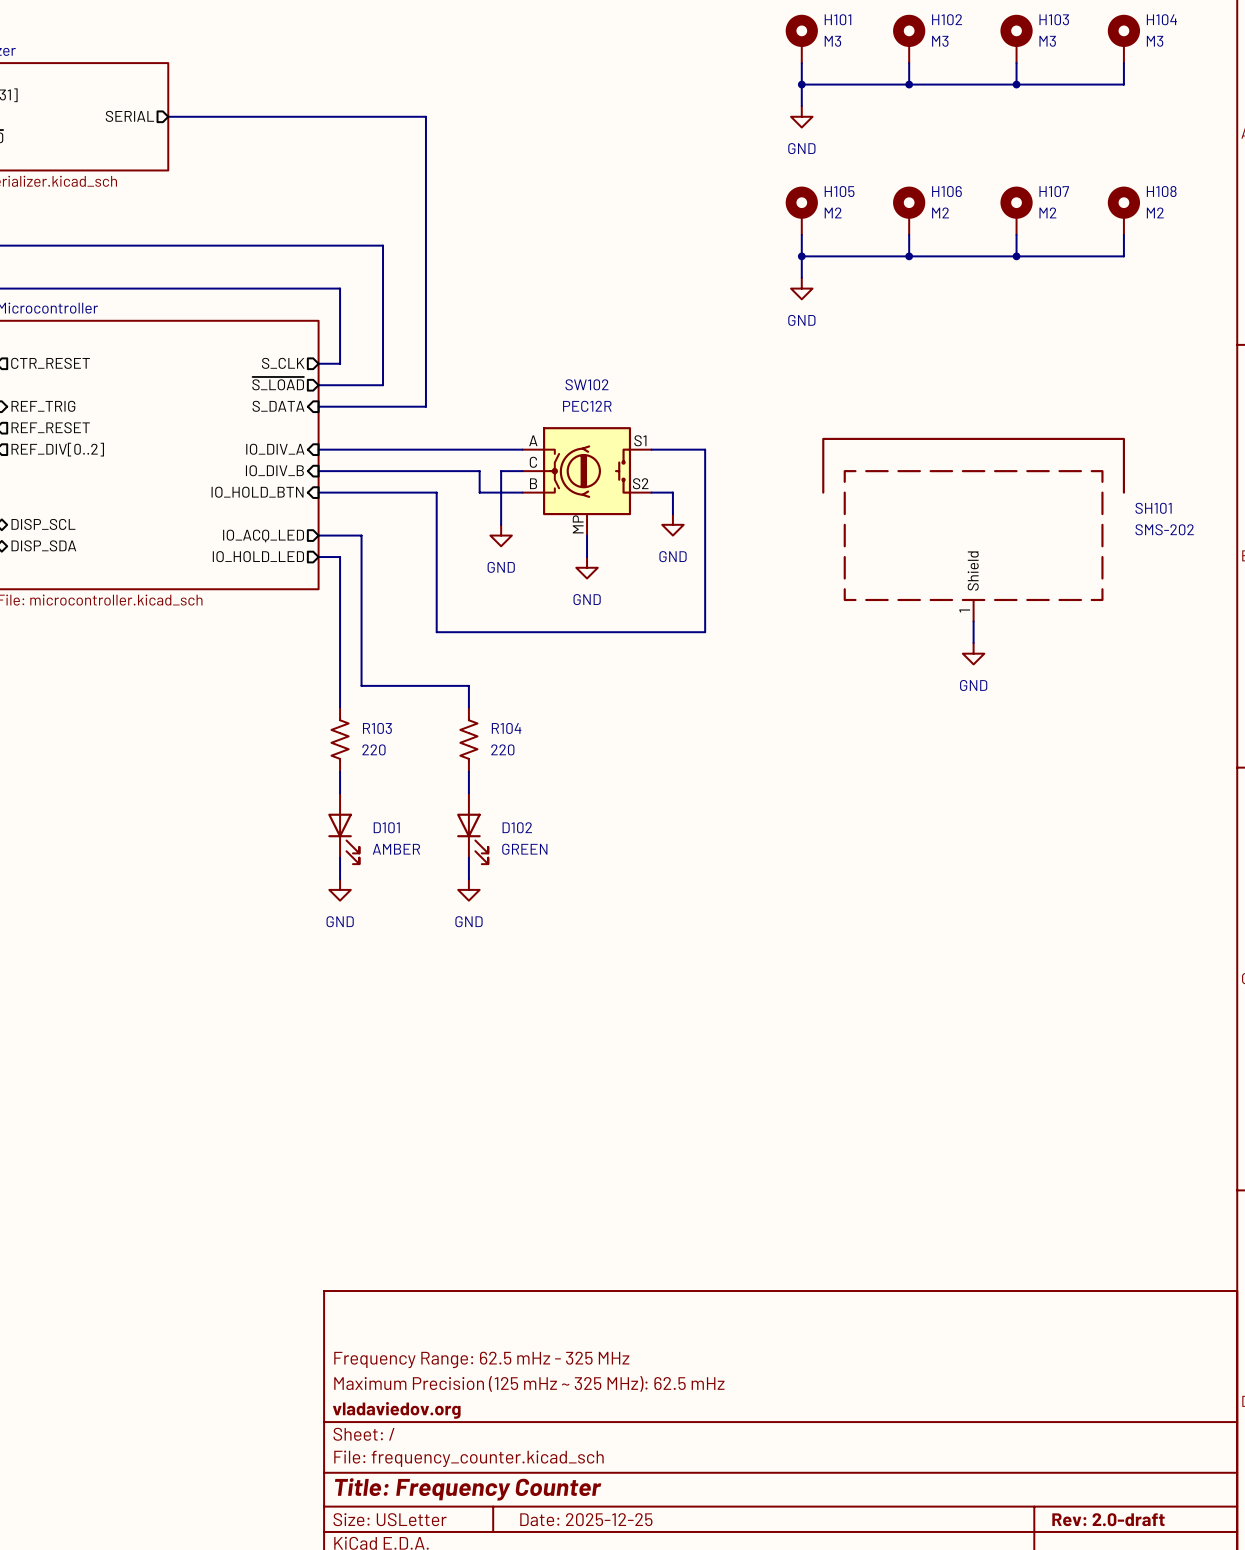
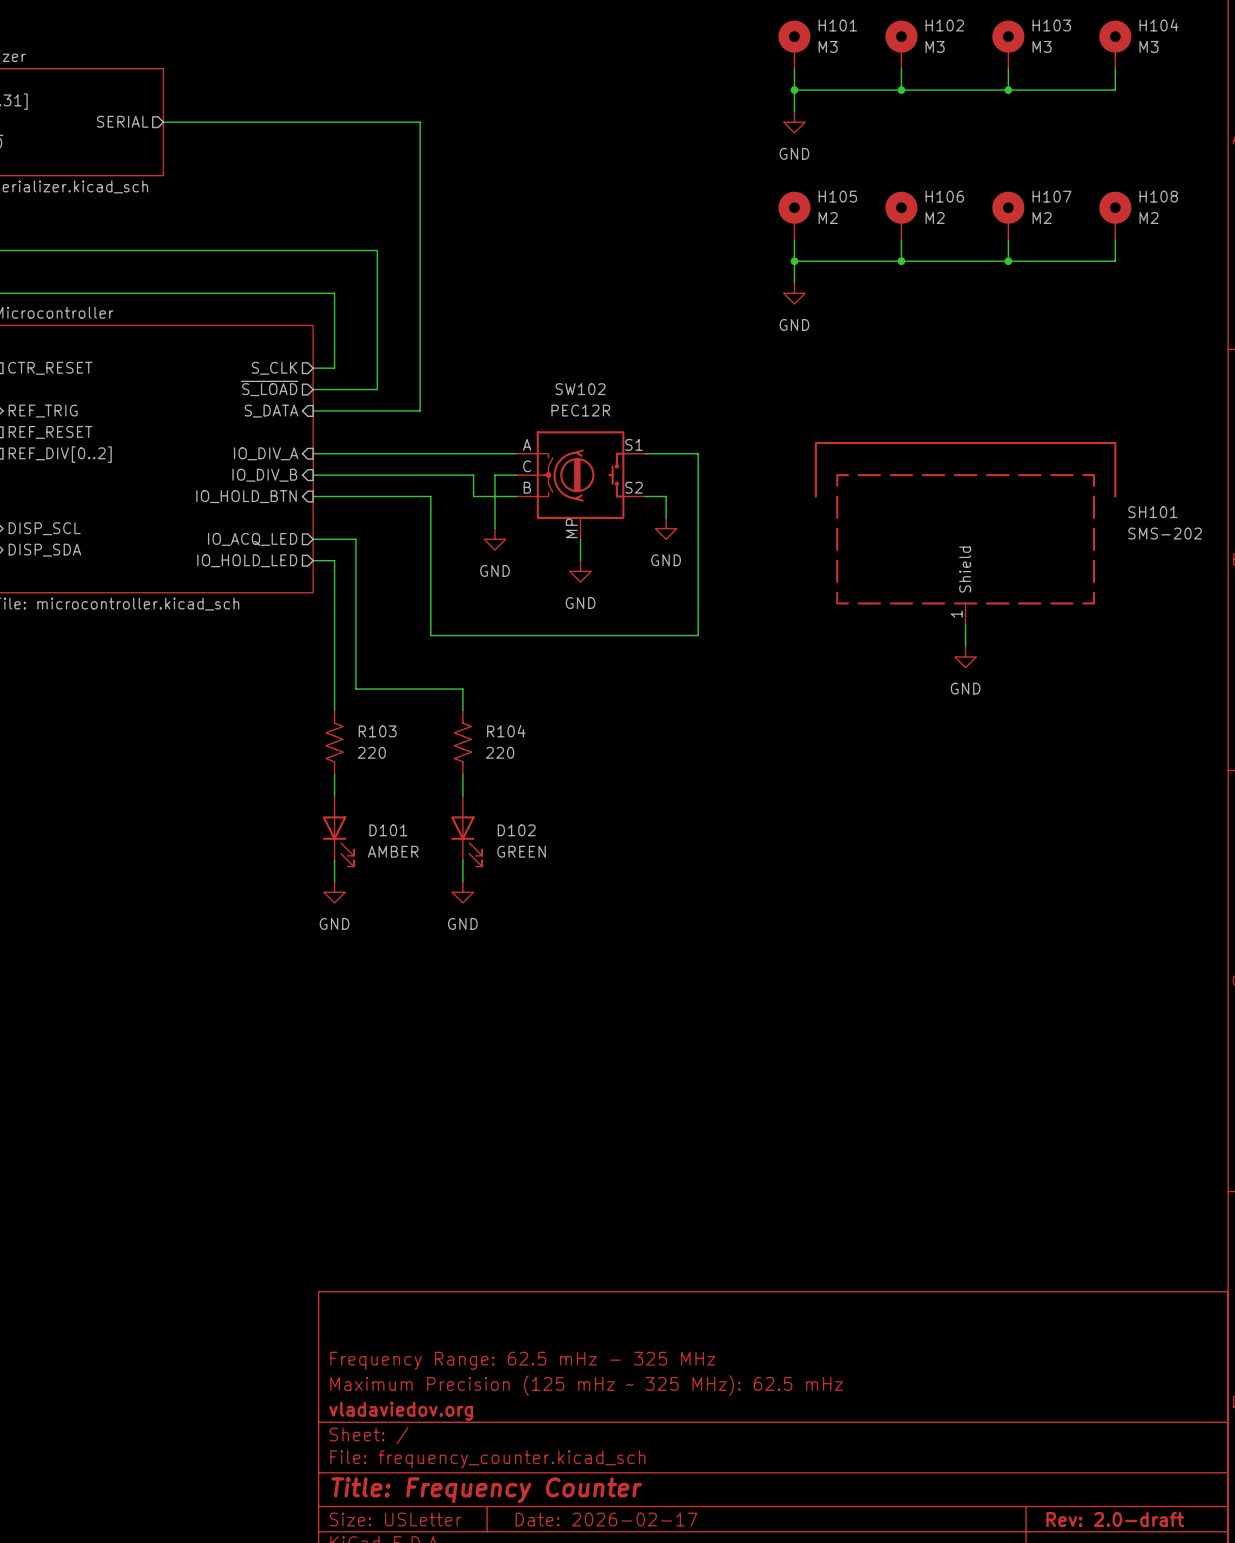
title block: Date: 2025-12-25 (586, 1519) -> Date: 2026-02-17 (606, 1519)

